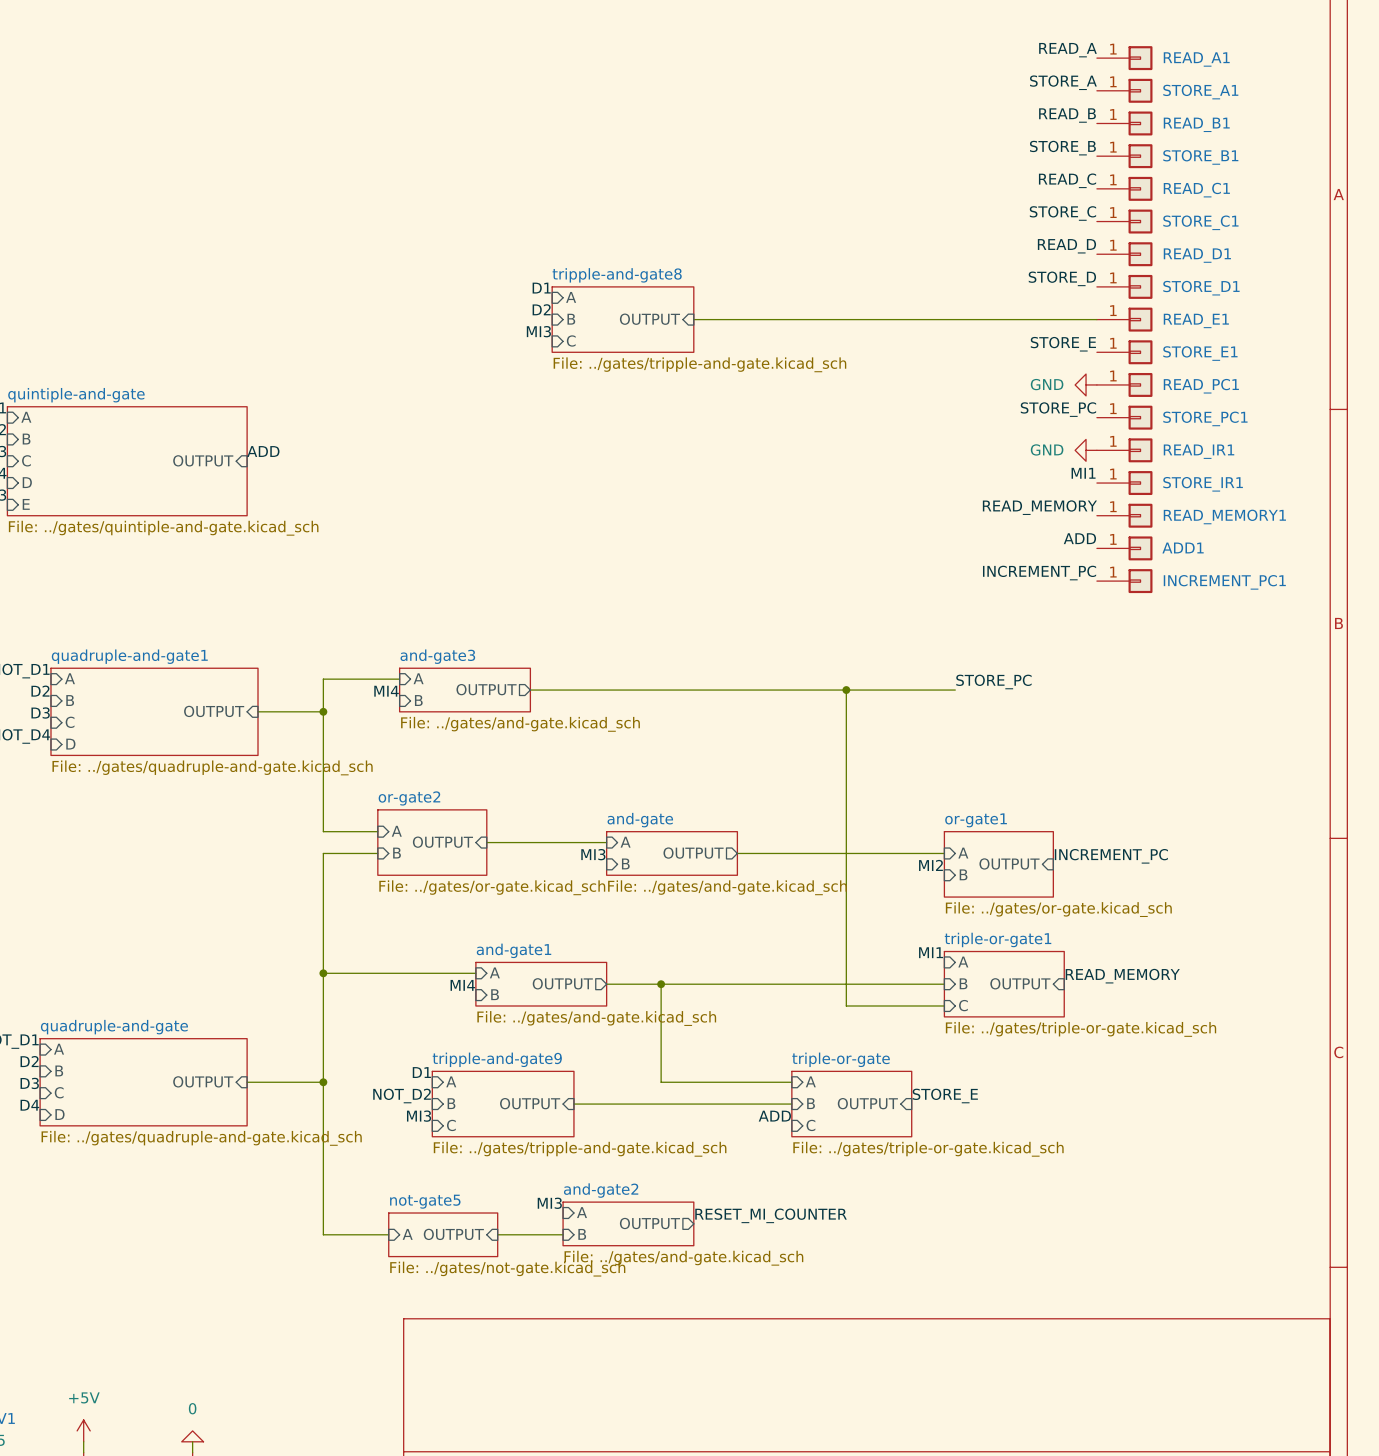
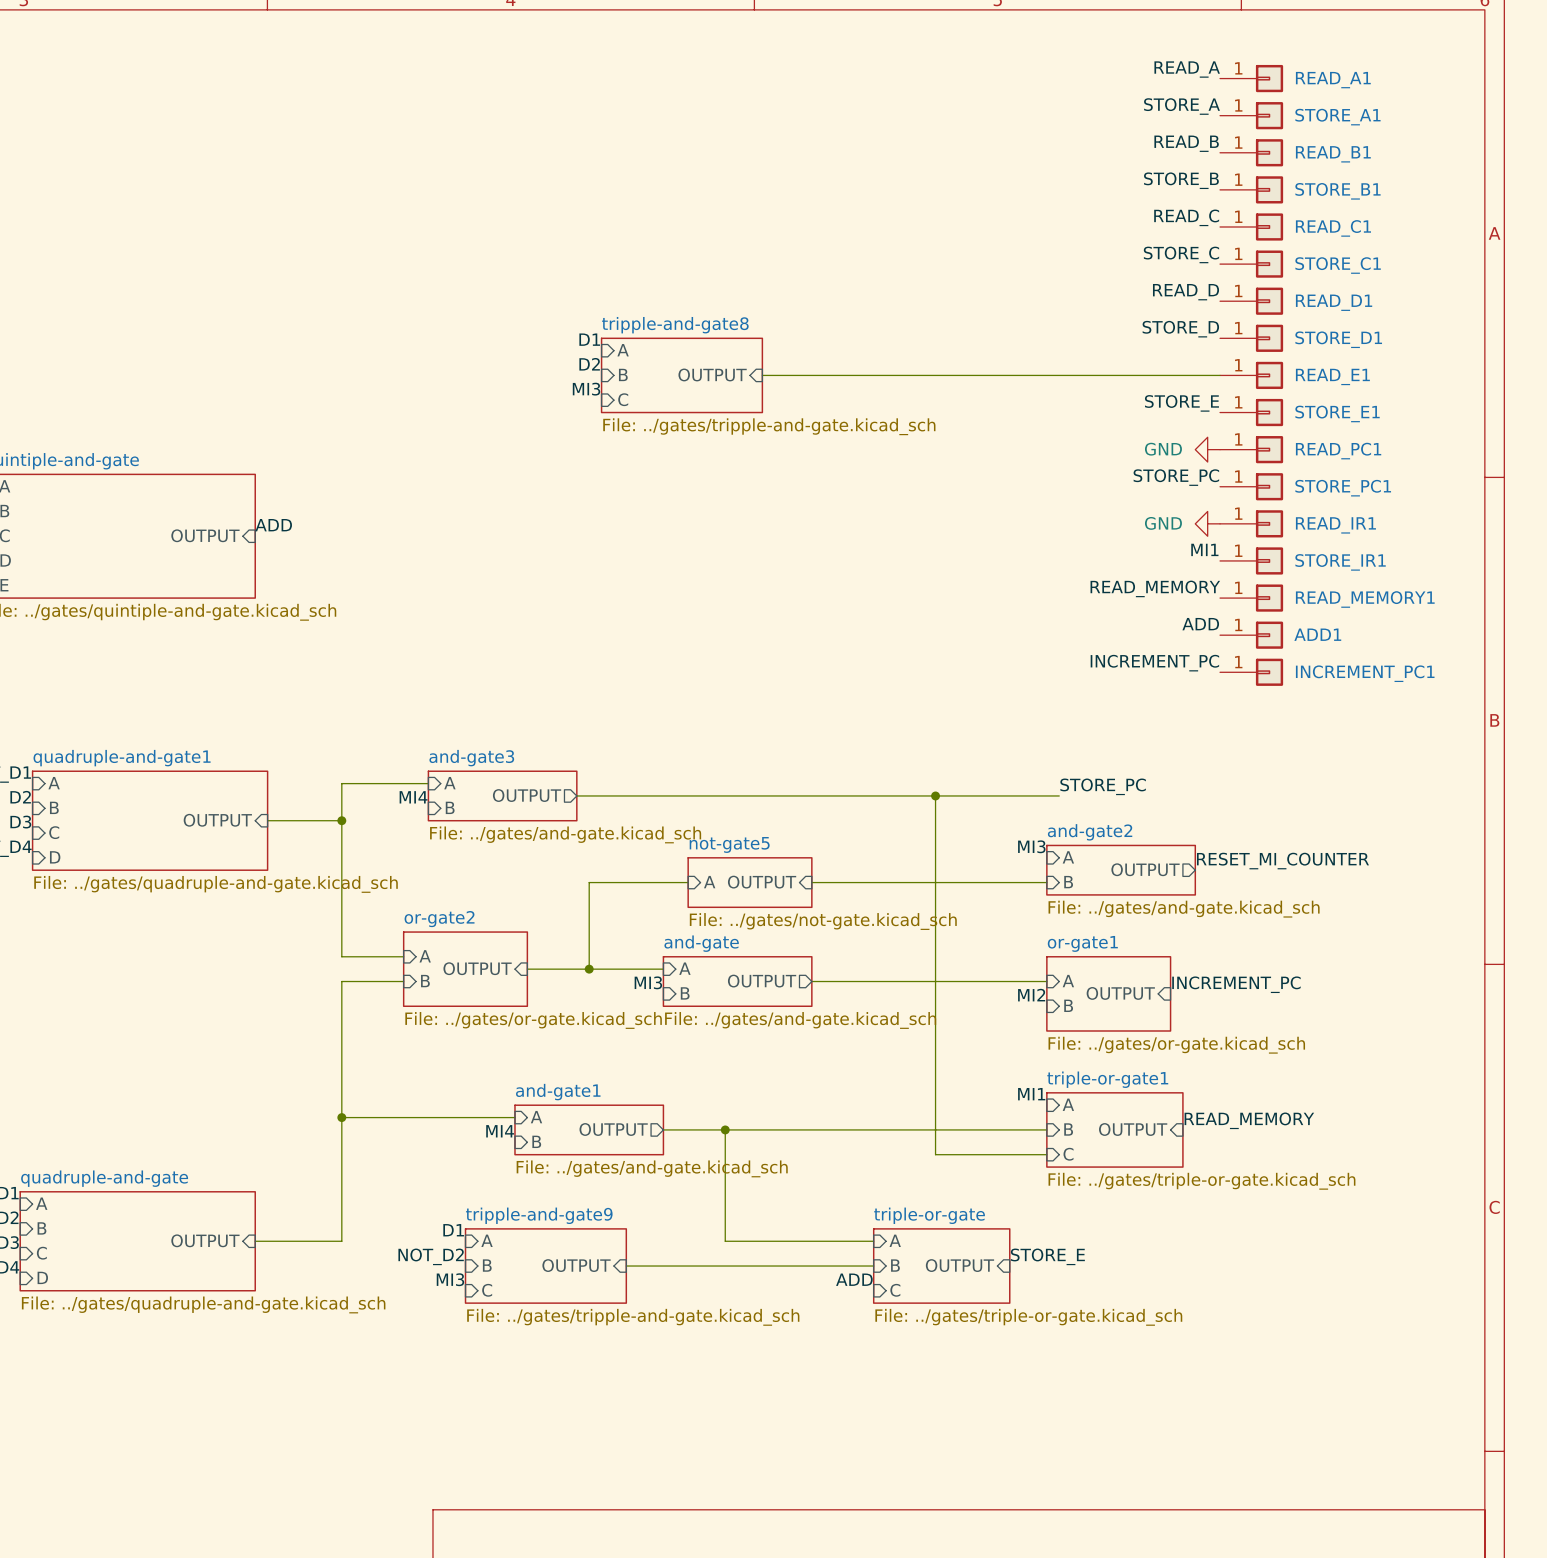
label: none -> MI3 (1031, 846)
sheet pin: none -> A (1068, 857)
label: none -> RESET_MI_COUNTER (1282, 861)
sheet pin: none -> OUTPUT (1145, 869)
sheet pin: none -> A (709, 882)
sheet pin: none -> OUTPUT (762, 882)
sheet pin: none -> B (1068, 882)
wire: none -> (688, 882) (589, 882) (589, 969)
wire: none -> (811, 882) (1046, 882)
junction: none -> (589, 969)
wire: (323, 1082) (323, 1234) (388, 1234) -> none
junction: (323, 1082) -> none
label: MI3 (549, 1203) -> none
sheet pin: A (582, 1212) -> none
label: RESET_MI_COUNTER (771, 1215) -> none
sheet and-gate2 position: (628, 1223) -> (1121, 870)
sheet pin: OUTPUT (649, 1223) -> none
sheet pin: A (407, 1234) -> none
sheet not-gate5 position: (443, 1234) -> (750, 882)
sheet pin: OUTPUT (453, 1234) -> none
wire: (497, 1234) (563, 1234) -> none
sheet pin: B (582, 1234) -> none

